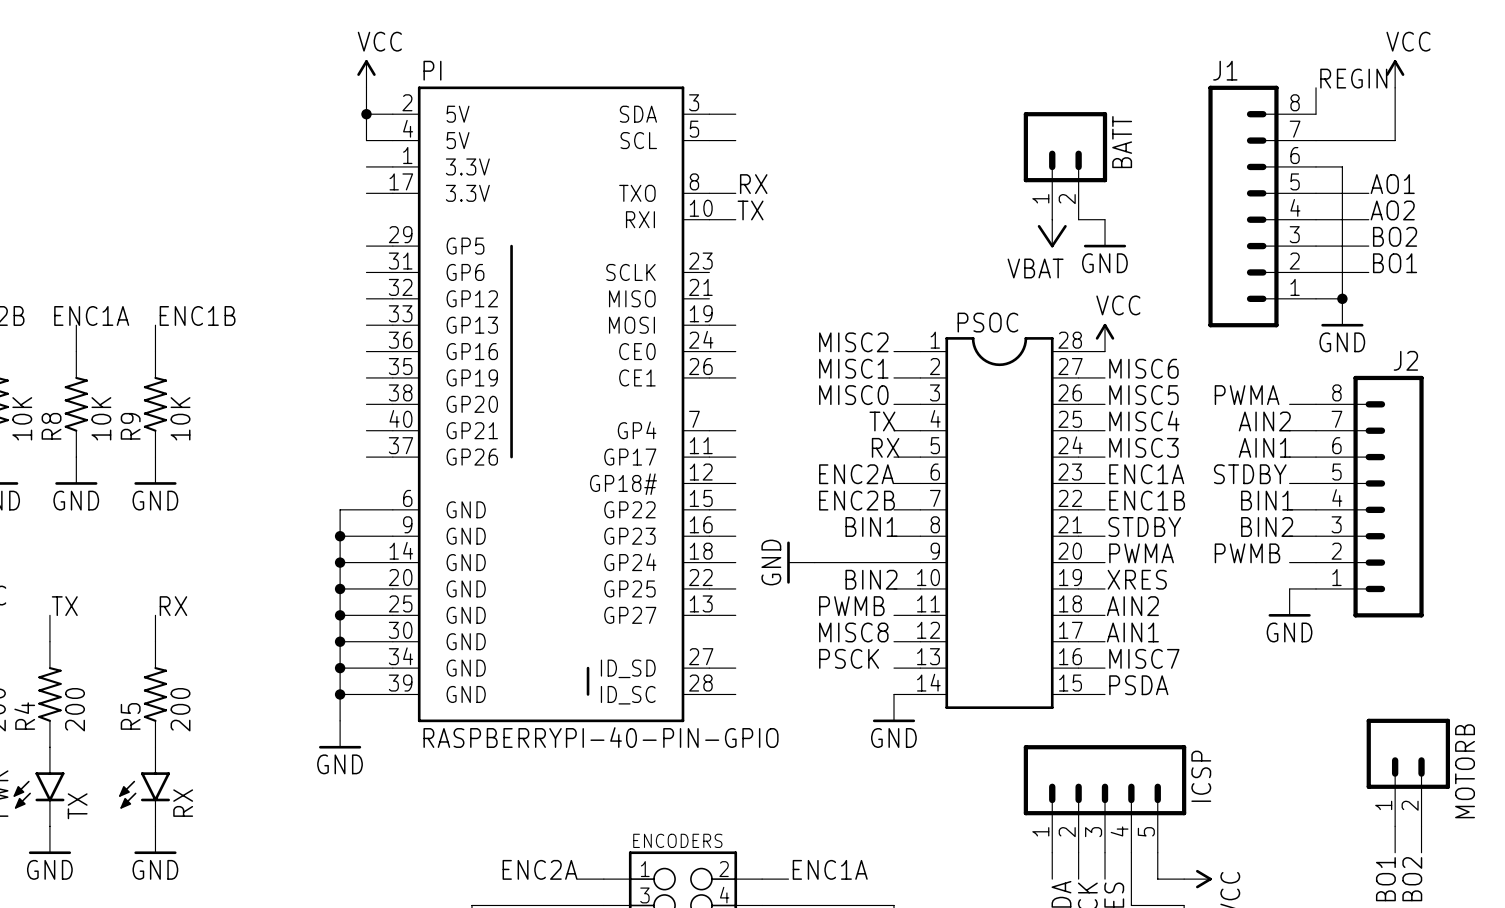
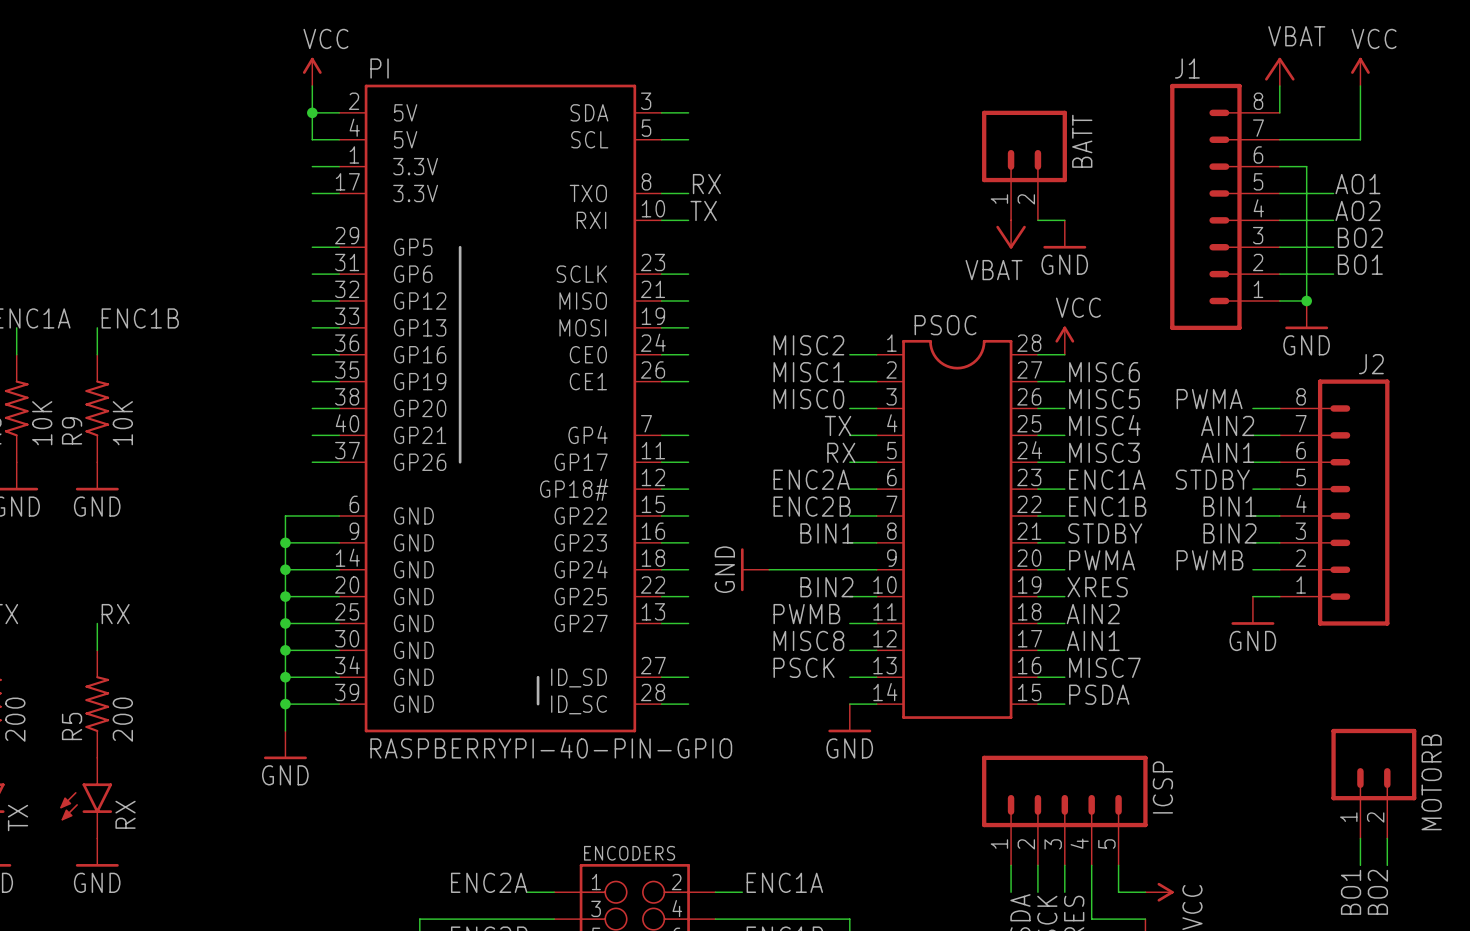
power symbol: none -> VBAT (1279, 71)
label: REGIN (1353, 78) -> none
wire: none -> (661, 274) (688, 274)
wire: none -> (661, 300) (688, 300)

